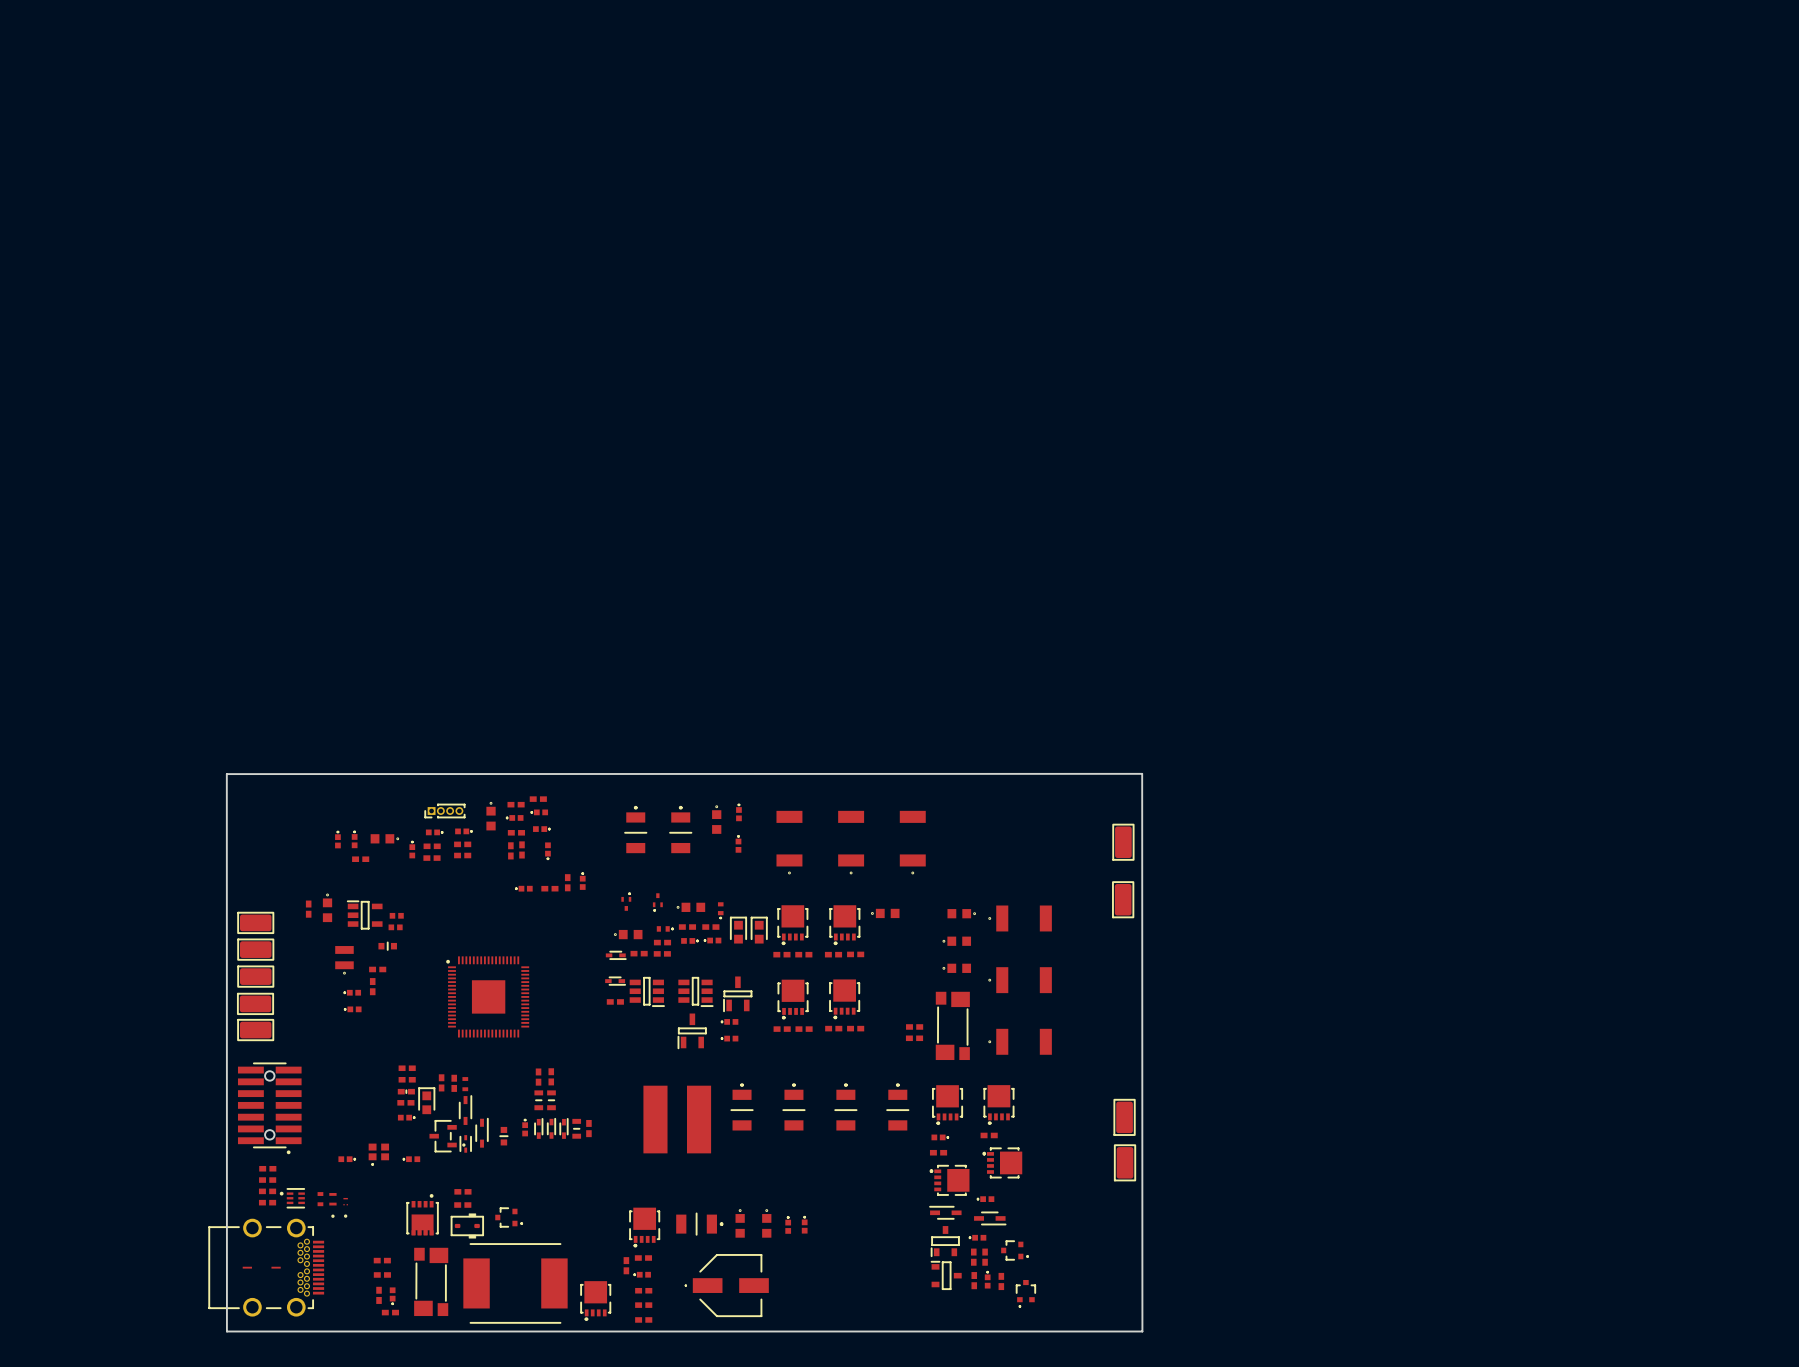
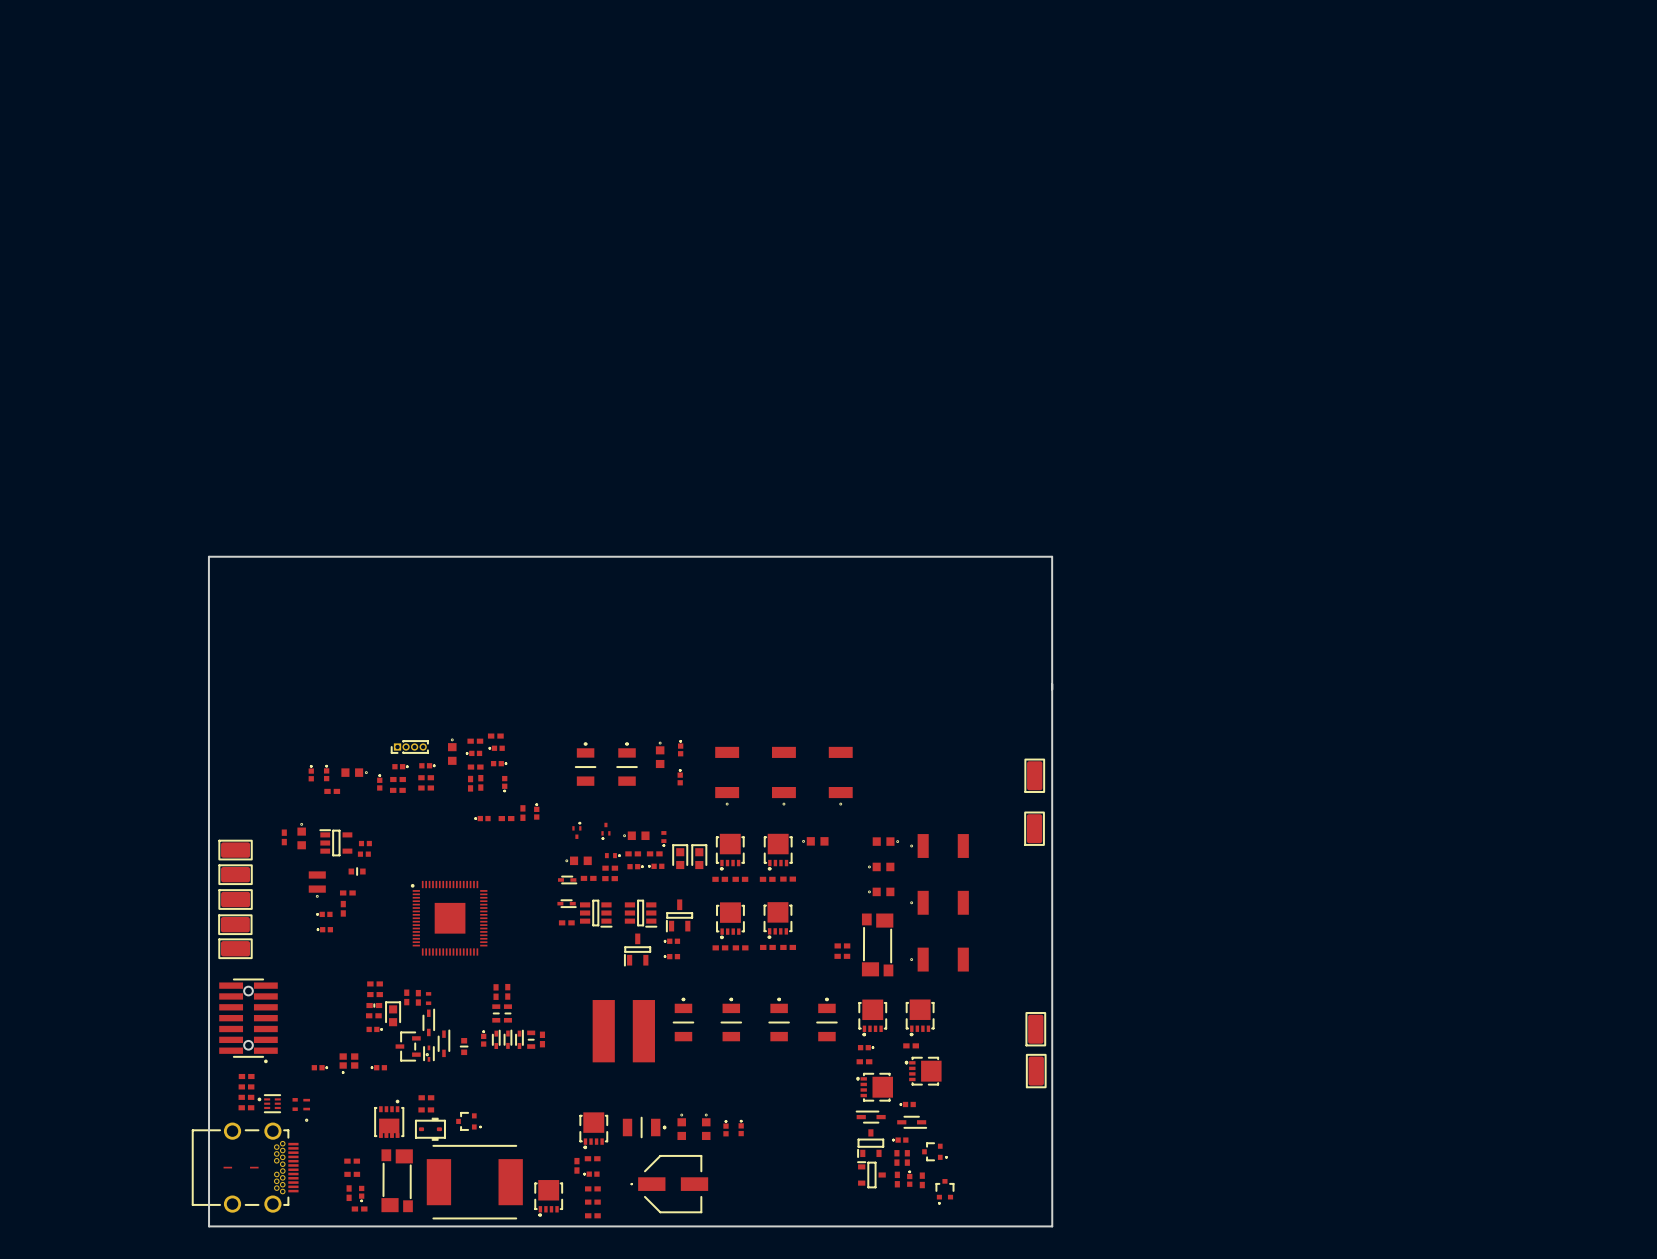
board edge: (226, 774) (1142, 773) (1142, 1331) -> (208, 712) (208, 556) (1052, 556) (1052, 1226)
part: (345, 1207) -> none

